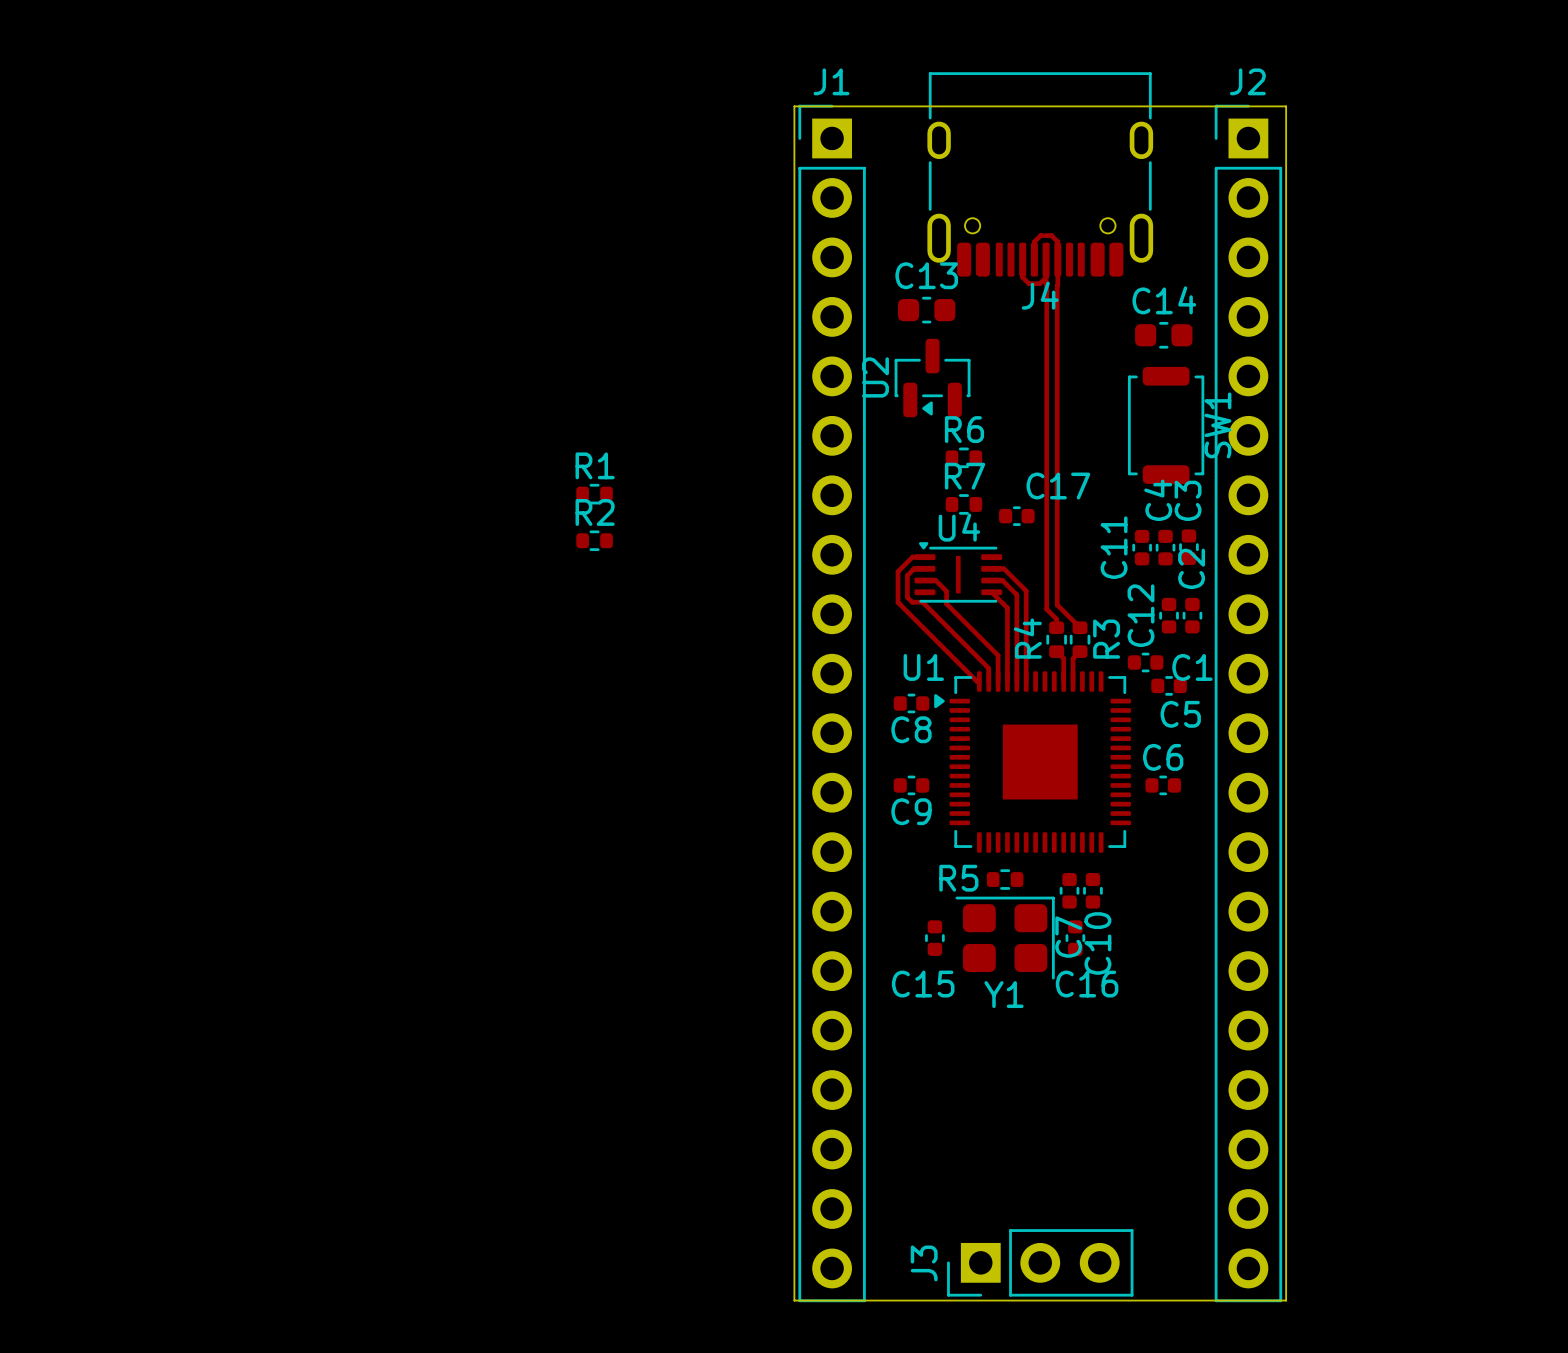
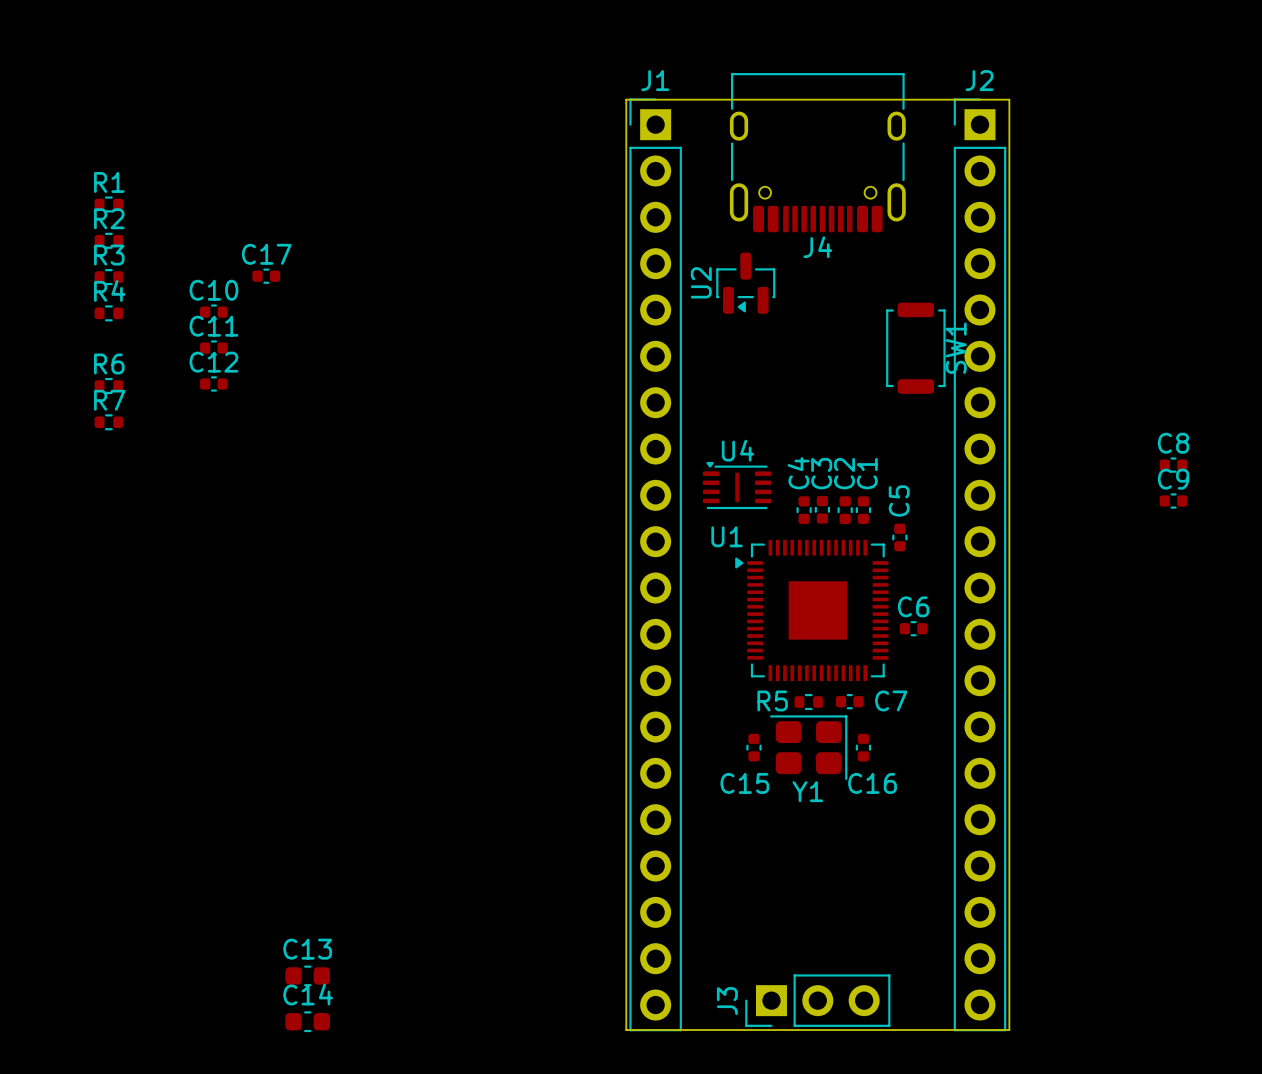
track: (1022, 259) (1022, 277) (1028, 283) (1039, 283) (1046, 277) -> none
track: (1034, 259) (1034, 241) (1040, 235) (1051, 235) (1057, 241) (1057, 604) (1080, 627) -> none
track: (1046, 259) (1046, 609) (1056, 619) (1056, 627) -> none
C13 position: (926, 310) -> (307, 975)
C14 position: (1163, 335) -> (307, 1021)
U2 position: (932, 378) -> (745, 283)
R6 position: (963, 457) -> (108, 385)
C17 name position: C17 (1058, 486) -> C17 (266, 254)
R1 position: (594, 494) -> (108, 204)
R7 position: (963, 504) -> (108, 422)
C17 position: (1016, 516) -> (266, 276)
R2 position: (594, 540) -> (108, 240)
C11 rotation: 0° (1142, 547) -> 90° clockwise (213, 348)
C11 position: (1142, 547) -> (213, 348)
C4 position: (1165, 547) -> (804, 510)
C3 position: (1188, 547) -> (822, 509)
track: (924, 557) (912, 557) (898, 571) (898, 602) (977, 681) (979, 681) -> none
track: (924, 568) (914, 568) (907, 575) (907, 597) (912, 602) (922, 602) (988, 668) (988, 681) -> none
track: (991, 568) (1004, 568) (1026, 590) (1026, 681) -> none
U4 position: (958, 572) -> (737, 485)
track: (924, 580) (935, 580) (946, 591) (946, 603) (998, 655) (998, 681) -> none
track: (991, 580) (1002, 580) (1016, 594) (1016, 681) -> none
track: (991, 592) (1007, 608) (1007, 681) -> none
C12 rotation: 0° (1169, 615) -> 90° clockwise (213, 383)
C12 position: (1169, 615) -> (213, 383)
C2 position: (1192, 615) -> (845, 510)
R4 rotation: 0° (1056, 639) -> 90° clockwise (108, 313)
R4 position: (1056, 639) -> (108, 313)
R3 rotation: 0° (1080, 639) -> 90° clockwise (108, 277)
R3 position: (1080, 639) -> (108, 277)
track: (1056, 651) (1063, 658) (1063, 681) -> none
track: (1080, 651) (1073, 658) (1073, 681) -> none
C1 rotation: 0° (1145, 662) -> 90° clockwise (863, 510)
C1 position: (1145, 662) -> (863, 510)
C1 name position: C1 (1192, 667) -> C1 (867, 473)
C5 rotation: 0° (1169, 685) -> 90° clockwise (899, 537)
C5 position: (1169, 685) -> (899, 537)
C8 position: (911, 703) -> (1173, 465)
C5 name position: C5 (1180, 714) -> C5 (899, 501)
C8 name position: C8 (911, 729) -> C8 (1173, 443)
C9 position: (911, 785) -> (1173, 501)
C9 name position: C9 (911, 811) -> C9 (1173, 479)
R5 position: (1005, 879) -> (808, 702)
C7 rotation: 0° (1069, 890) -> 90° clockwise (849, 701)
C10 rotation: 0° (1092, 890) -> 90° clockwise (213, 312)
C10 position: (1092, 890) -> (213, 312)
C7 name position: C7 (1068, 937) -> C7 (891, 700)
C15 position: (934, 938) -> (753, 747)
Y1 position: (1005, 938) -> (808, 747)
C16 position: (1075, 938) -> (863, 747)
C10 name position: C10 (1097, 943) -> C10 (213, 290)

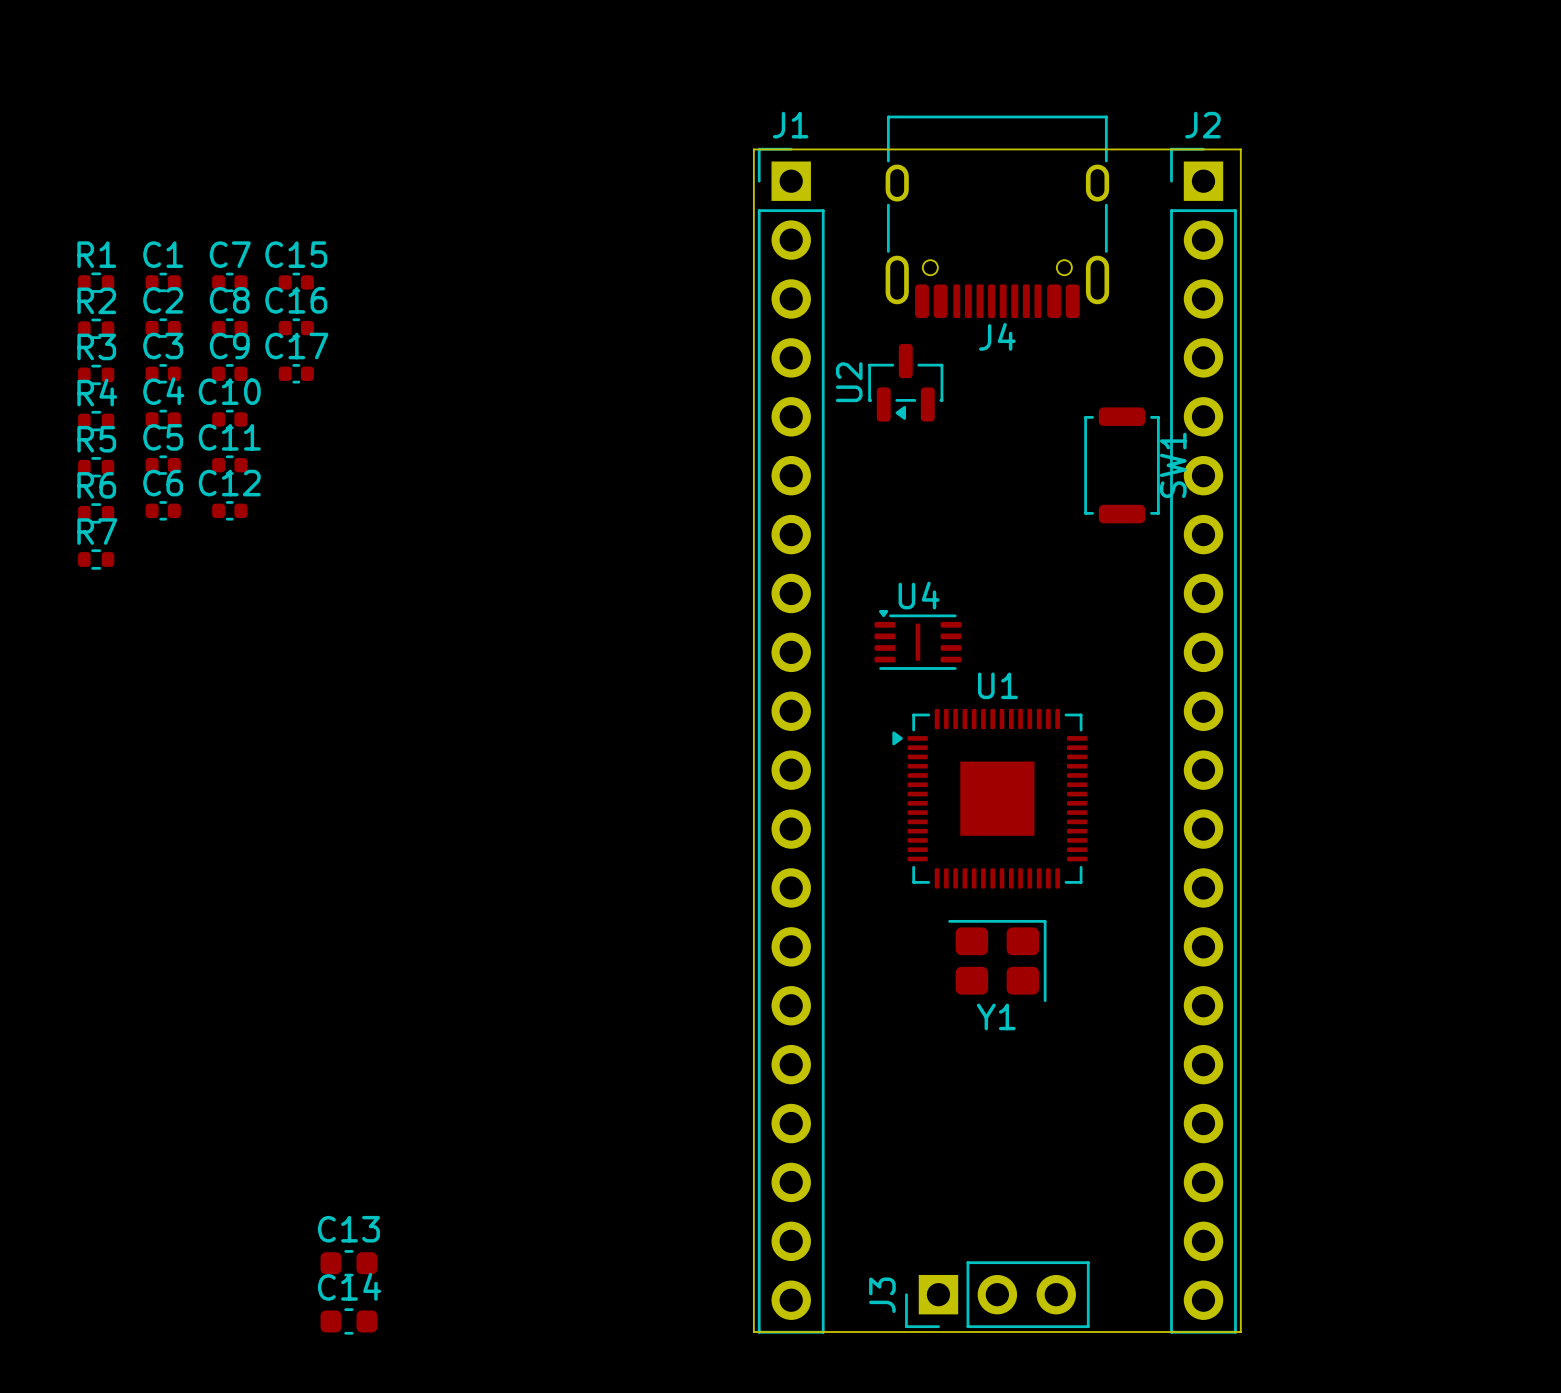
C8 position: (1173, 465) -> (229, 328)
U4 position: (737, 485) -> (917, 639)
C9 position: (1173, 501) -> (229, 373)
C3 rotation: 0° (822, 509) -> 90° clockwise (163, 373)
C3 position: (822, 509) -> (163, 373)
C4 rotation: 0° (804, 510) -> 90° clockwise (163, 419)
C4 position: (804, 510) -> (163, 419)
C2 rotation: 0° (845, 510) -> 90° clockwise (163, 328)
C2 position: (845, 510) -> (163, 328)
C1 rotation: 0° (863, 510) -> 90° clockwise (163, 282)
C1 position: (863, 510) -> (163, 282)
U1 name position: U1 (727, 536) -> U1 (997, 685)
C5 rotation: 0° (899, 537) -> 90° clockwise (163, 465)
C5 position: (899, 537) -> (163, 465)
C6 position: (913, 628) -> (163, 510)
R5 name position: R5 (772, 700) -> R5 (96, 439)
C7 name position: C7 (891, 700) -> C7 (230, 254)
C7 position: (849, 701) -> (229, 282)
R5 position: (808, 702) -> (96, 467)
C15 rotation: 0° (753, 747) -> 90° clockwise (296, 282)
C15 position: (753, 747) -> (296, 282)
Y1 position: (808, 747) -> (997, 961)
C16 rotation: 0° (863, 747) -> 90° clockwise (296, 328)
C16 position: (863, 747) -> (296, 328)
C15 name position: C15 (744, 783) -> C15 (296, 254)
C16 name position: C16 (872, 783) -> C16 (296, 300)

